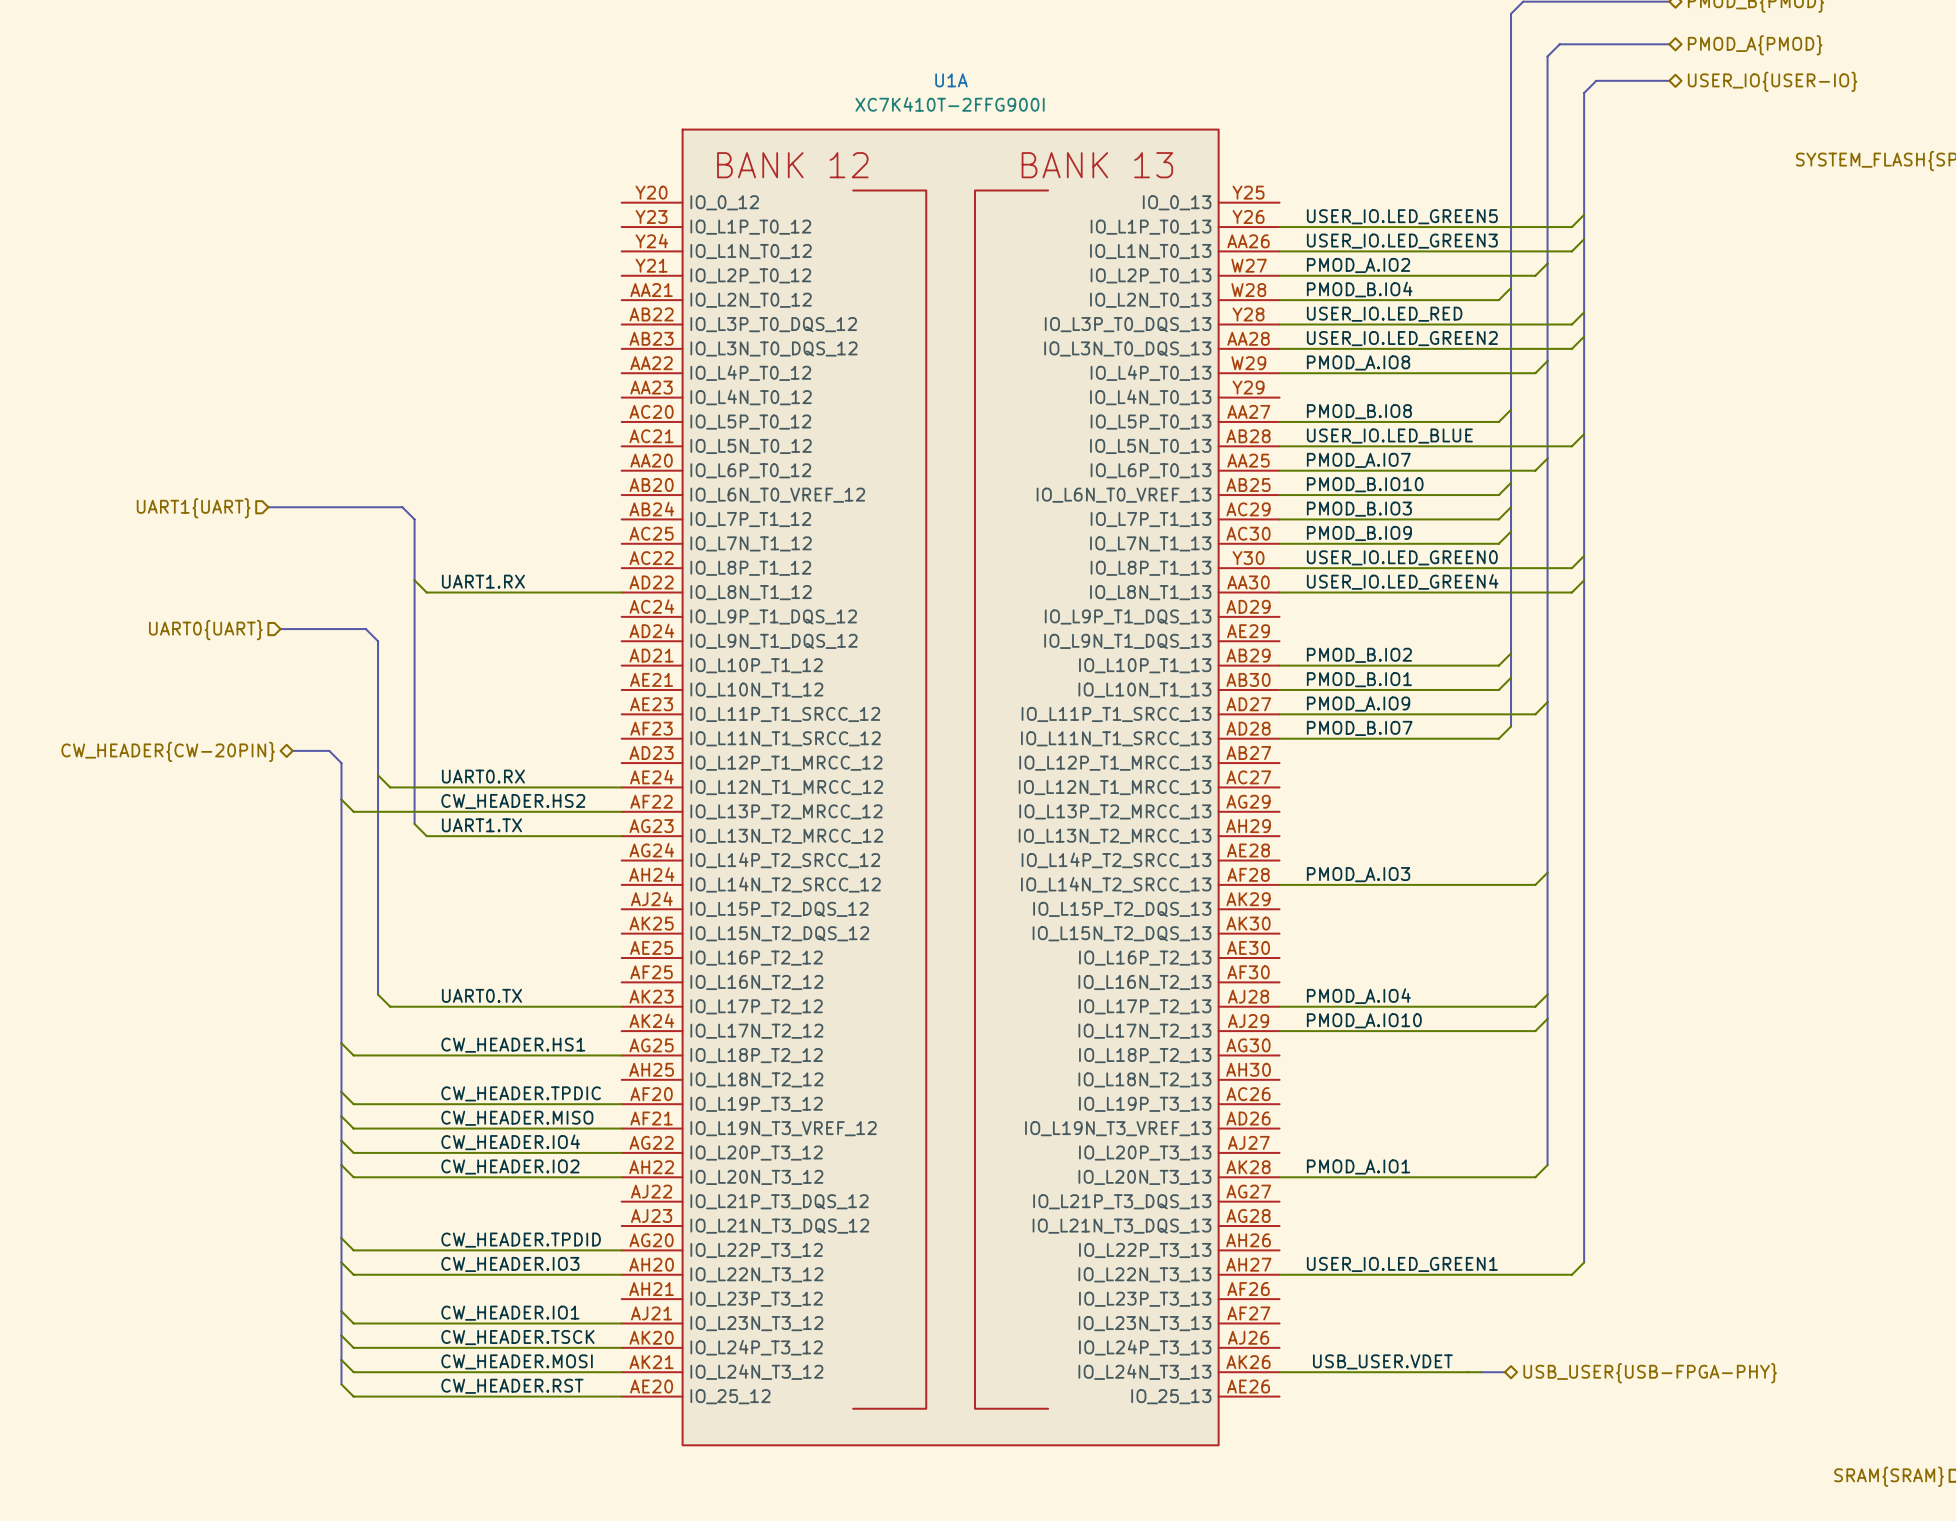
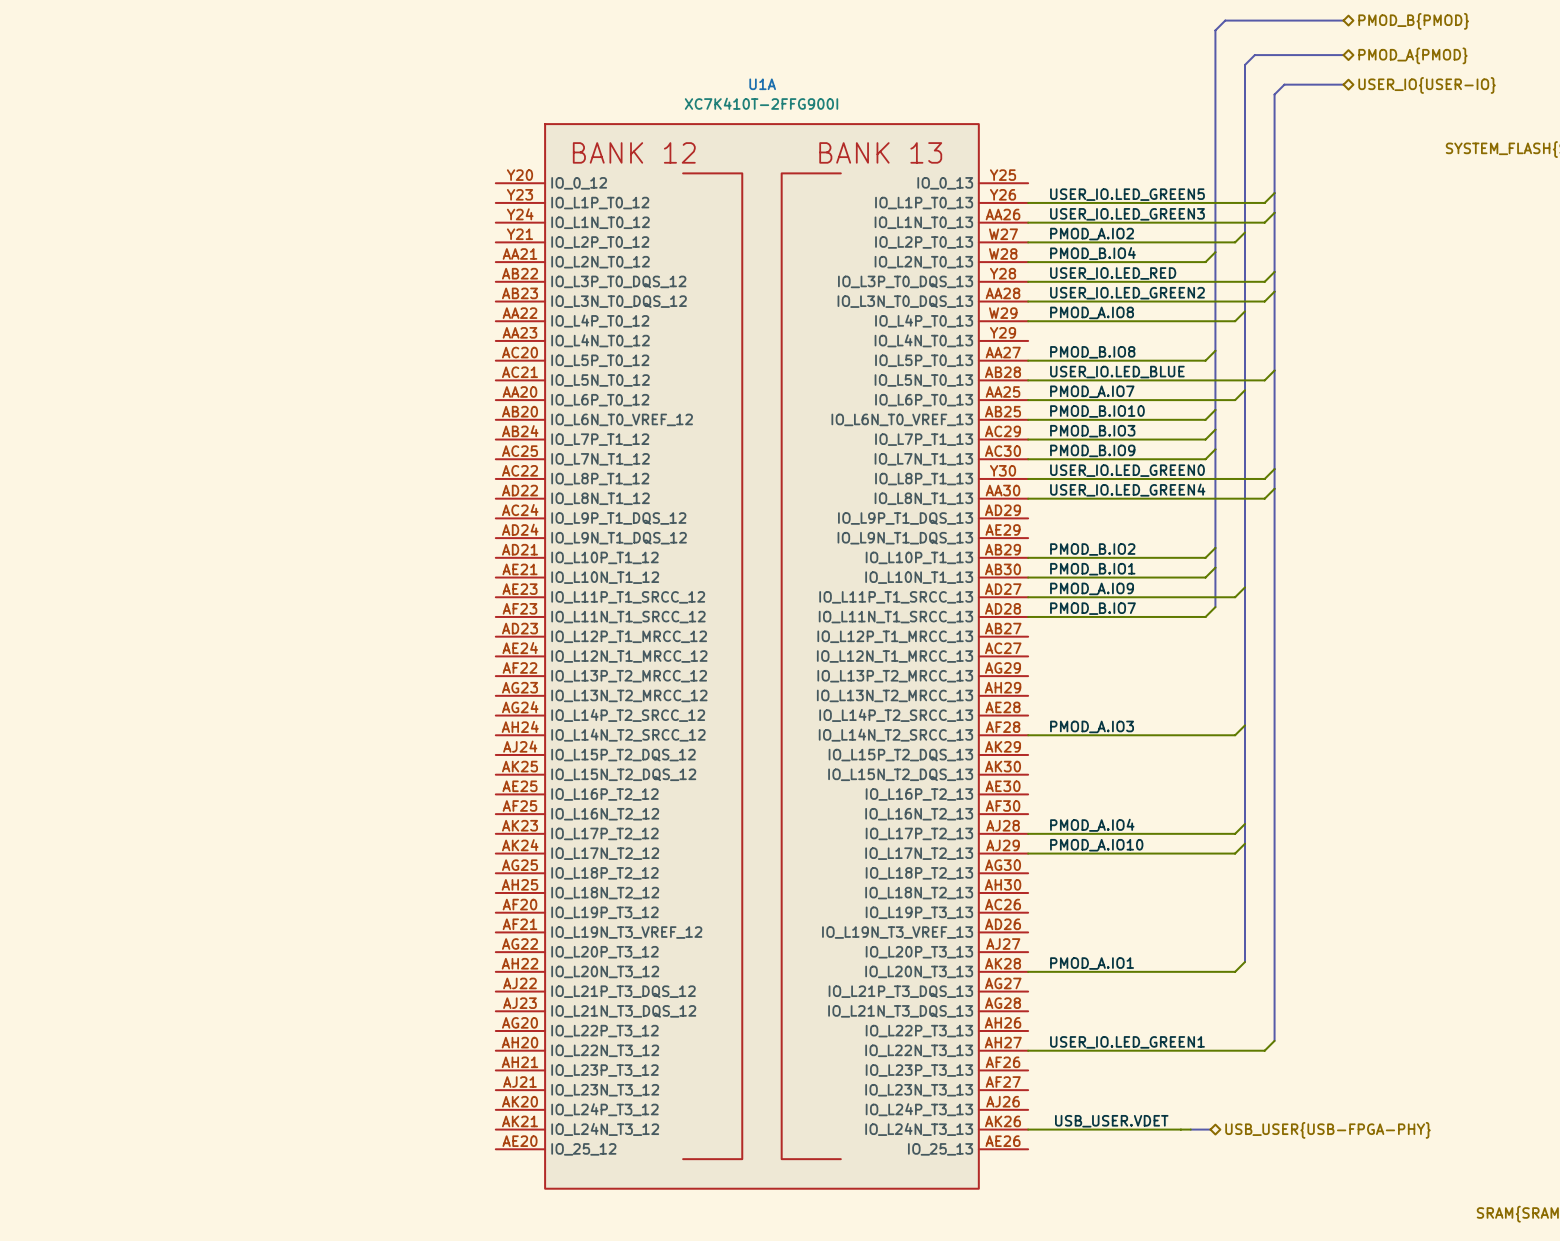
bus: (268, 507) (402, 507) (414, 519) (414, 823) -> none
hierarchical label: UART1{UART} (193, 508) -> none
wire: (414, 580) (426, 592) (621, 592) -> none
label: UART1.RX (483, 581) -> none
bus: (280, 629) (365, 629) (378, 641) (378, 994) -> none
hierarchical label: UART0{UART} (205, 630) -> none
bus: (292, 750) (329, 750) (341, 763) (341, 1384) -> none
hierarchical label: CW_HEADER{CW-20PIN} (168, 751) -> none
wire: (378, 775) (390, 787) (621, 787) -> none
label: UART0.RX (483, 776) -> none
wire: (341, 799) (353, 811) (621, 811) -> none
label: CW_HEADER.HS2 (513, 801) -> none
wire: (414, 823) (426, 836) (621, 836) -> none
label: UART1.TX (481, 825) -> none
wire: (378, 994) (390, 1006) (621, 1006) -> none
label: UART0.TX (481, 995) -> none
wire: (341, 1043) (353, 1055) (621, 1055) -> none
label: CW_HEADER.HS1 (513, 1045) -> none
wire: (341, 1092) (353, 1104) (621, 1104) -> none
label: CW_HEADER.TPDIC (521, 1093) -> none
wire: (341, 1116) (353, 1128) (621, 1128) -> none
label: CW_HEADER.MISO (517, 1118) -> none
wire: (341, 1140) (353, 1152) (621, 1152) -> none
label: CW_HEADER.IO4 (510, 1142) -> none
wire: (341, 1165) (353, 1177) (621, 1177) -> none
label: CW_HEADER.IO2 (510, 1166) -> none
wire: (341, 1238) (353, 1250) (621, 1250) -> none
label: CW_HEADER.TPDID (521, 1240) -> none
wire: (341, 1262) (353, 1274) (621, 1274) -> none
label: CW_HEADER.IO3 (510, 1264) -> none
wire: (341, 1311) (353, 1323) (621, 1323) -> none
label: CW_HEADER.IO1 (510, 1313) -> none
wire: (341, 1335) (353, 1347) (621, 1347) -> none
label: CW_HEADER.TSCK (517, 1337) -> none
wire: (341, 1360) (353, 1372) (621, 1372) -> none
label: CW_HEADER.MOSI (517, 1361) -> none
wire: (341, 1384) (353, 1396) (621, 1396) -> none
label: CW_HEADER.RST (512, 1386) -> none

